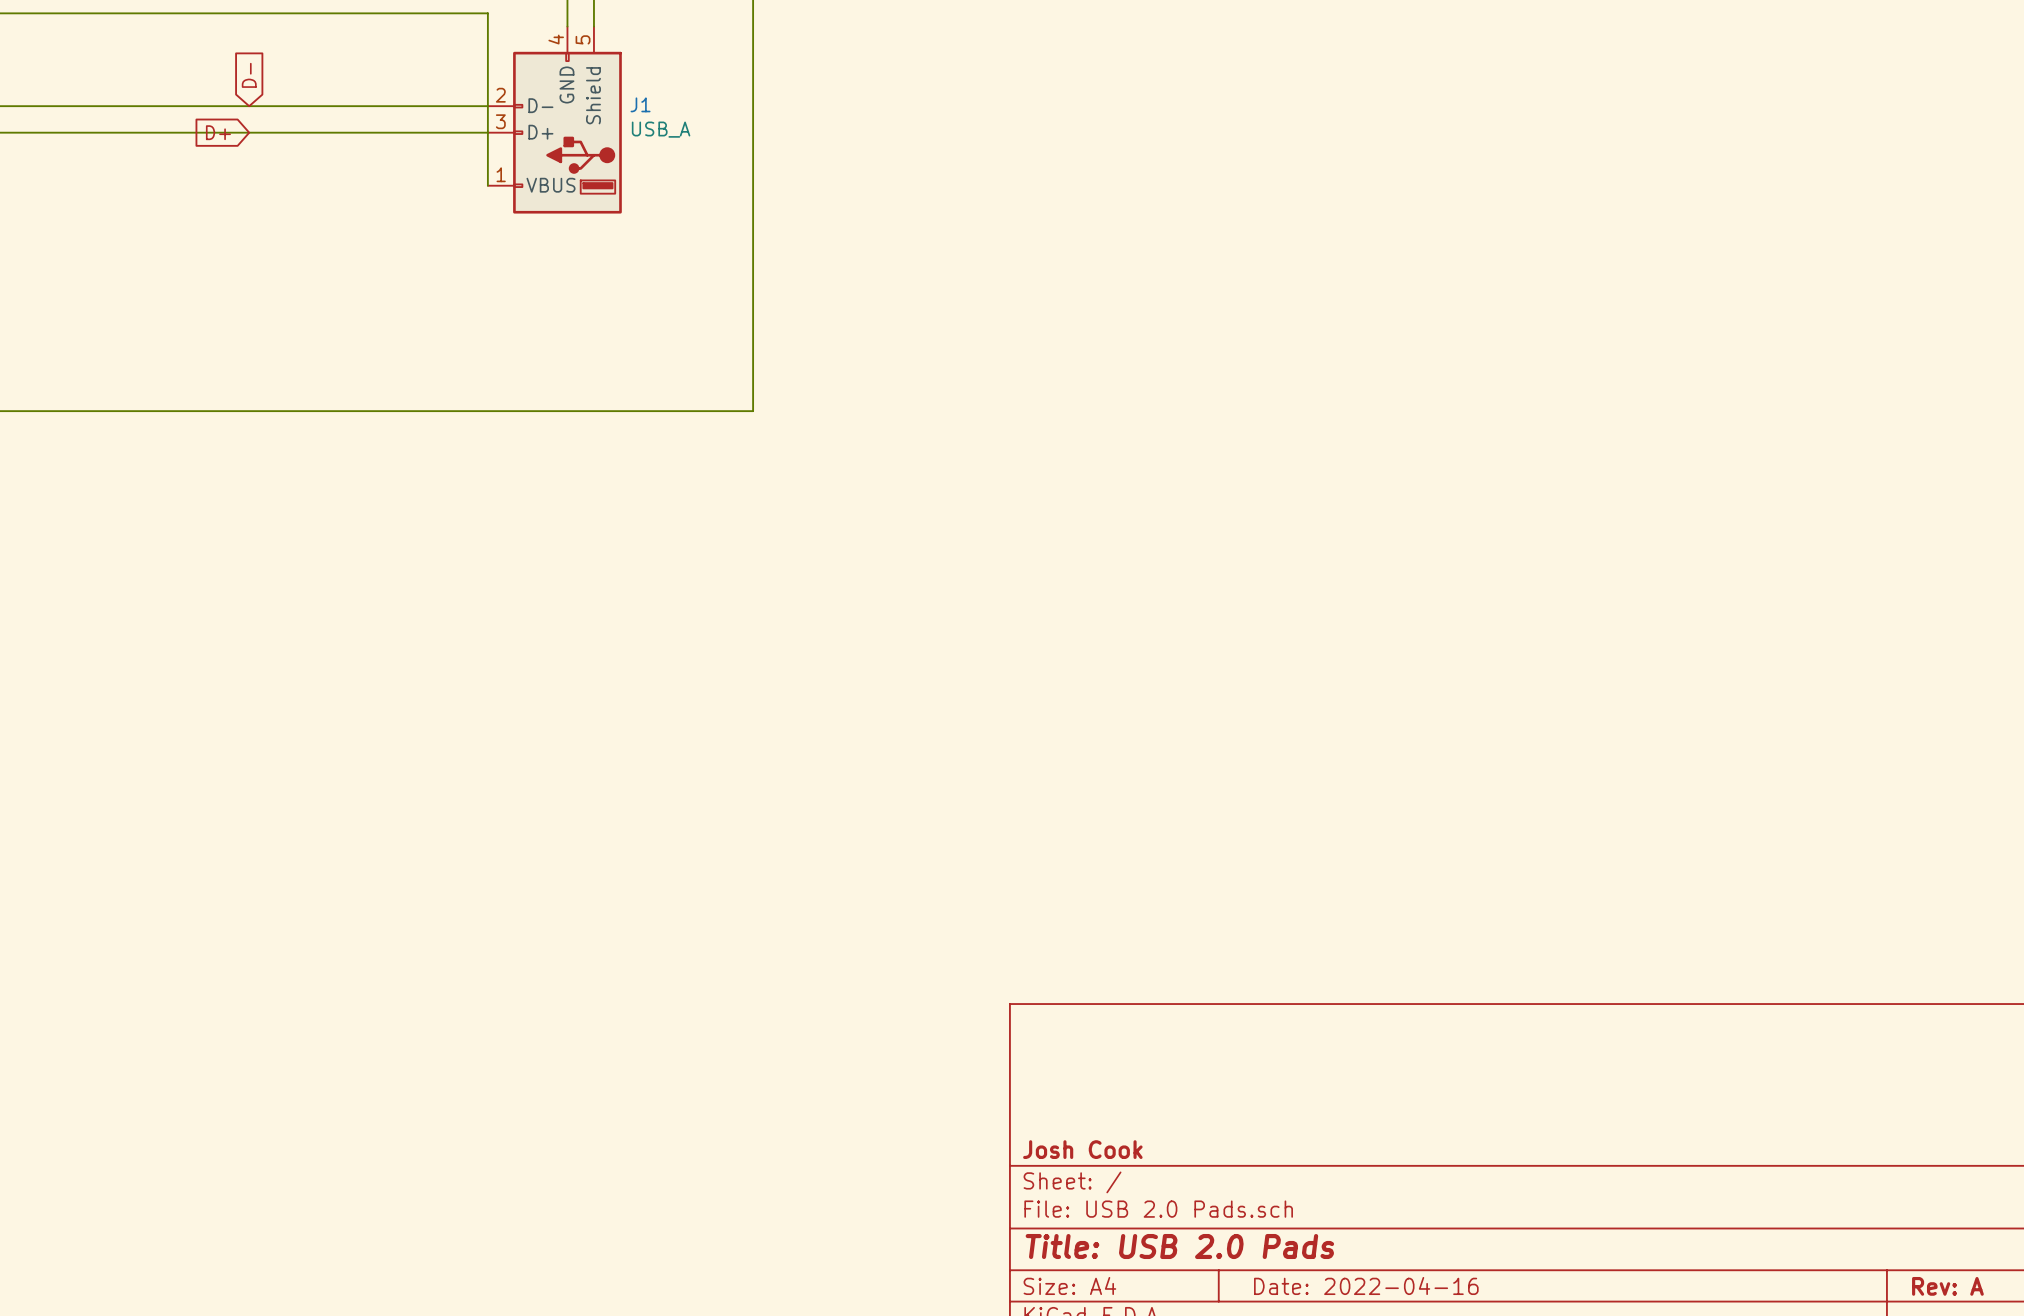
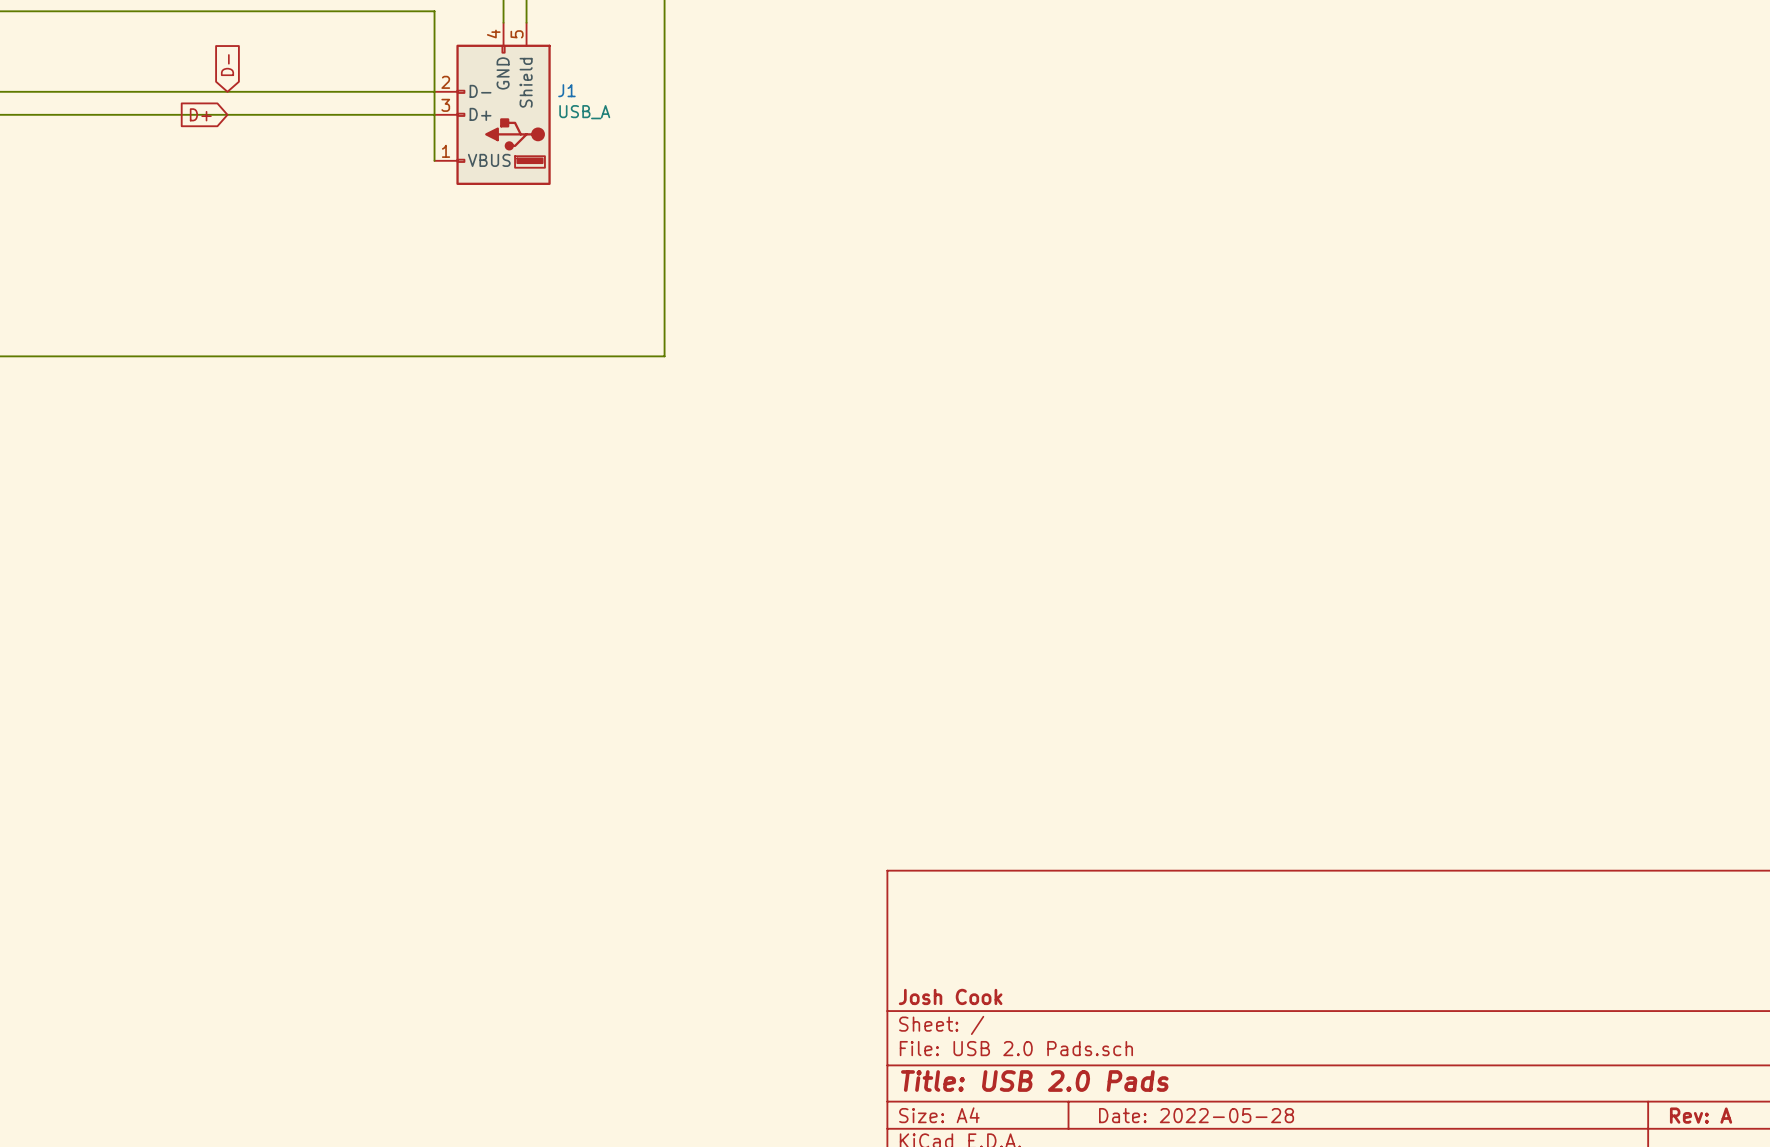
title block: Date: 2022-04-16 (1366, 1286) -> Date: 2022-05-28 (1196, 1115)

